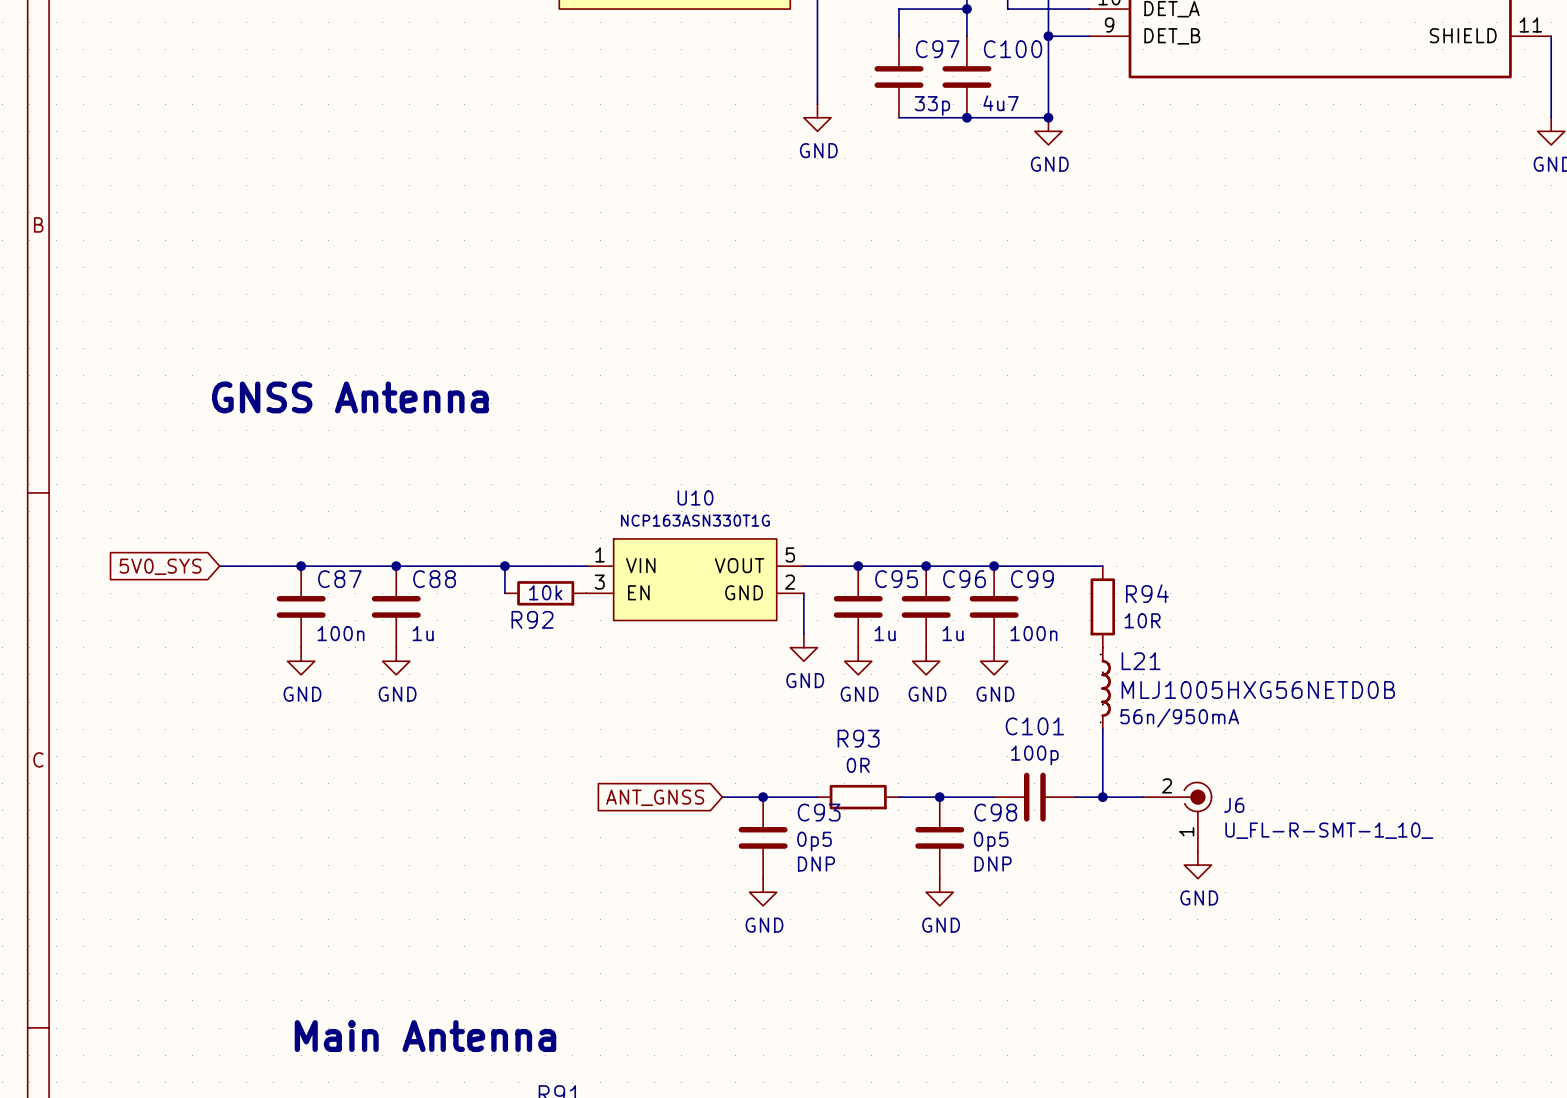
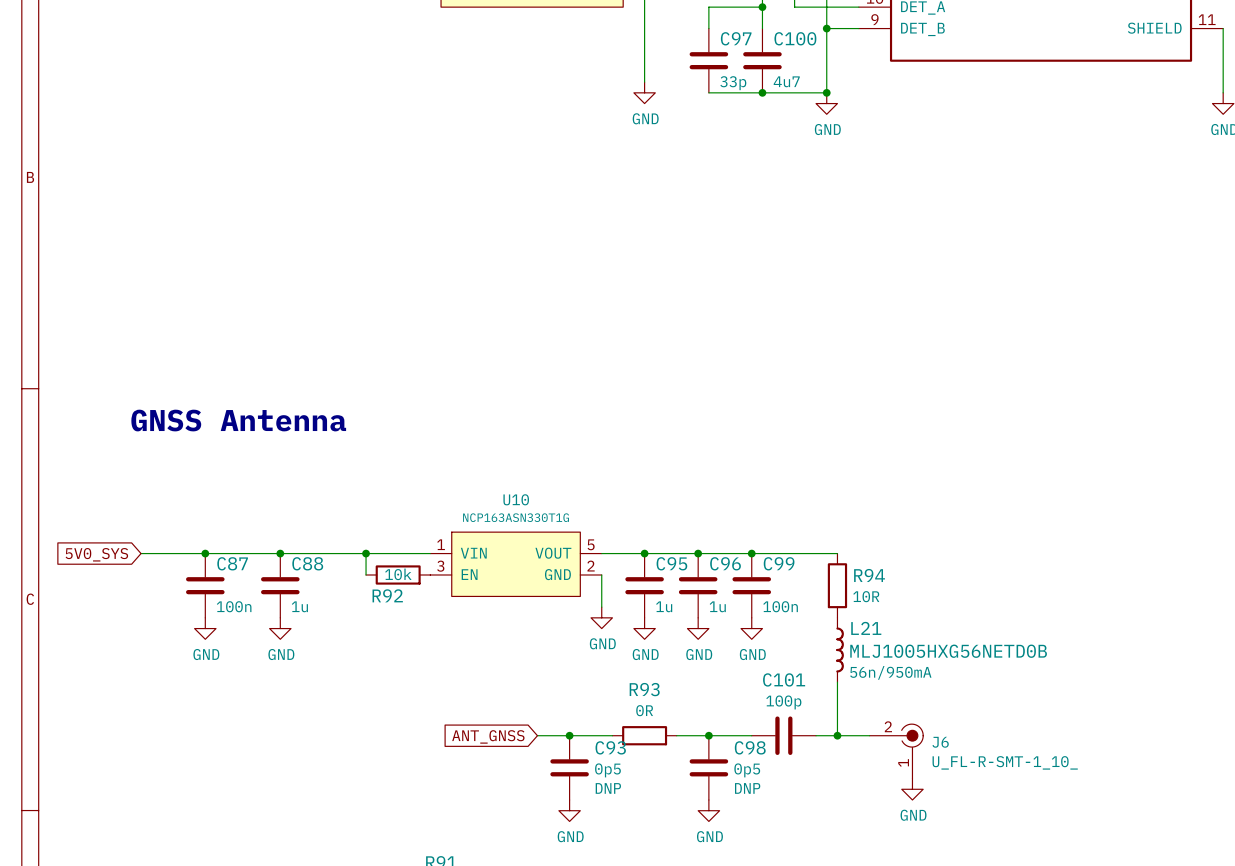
text position: GNSS Antenna (350, 397) -> GNSS Antenna (238, 420)
global label position: 5V0_SYS (160, 566) -> 5V0_SYS (96, 554)
wire: (219, 566) (586, 566) -> (141, 553) (430, 553)
junction: (301, 566) -> none
junction: (396, 566) -> none
wire: (504, 566) (504, 593) -> (366, 553) (366, 574)
junction: (504, 566) -> none
wire: (803, 566) (1102, 566) -> (601, 553) (837, 553)
junction: (858, 566) -> none
junction: (926, 566) -> none
junction: (994, 566) -> none
U10 position: (695, 579) -> (516, 564)
R92 position: (545, 593) -> (398, 574)
wire: (803, 593) (803, 634) -> (601, 574) (601, 607)
C87 position: (301, 606) -> (205, 585)
C88 position: (396, 606) -> (280, 585)
C95 position: (858, 606) -> (644, 585)
C96 position: (926, 606) -> (698, 585)
C99 position: (994, 606) -> (751, 585)
R94 position: (1102, 606) -> (837, 585)
power symbol: GND (803, 647) -> none
power symbol: GND (301, 661) -> none
power symbol: GND (396, 661) -> none
power symbol: GND (858, 661) -> none
power symbol: GND (926, 661) -> none
power symbol: GND (994, 661) -> none
L21 position: (1105, 688) -> (839, 649)
junction: none -> (205, 553)
junction: none -> (280, 553)
junction: none -> (366, 553)
junction: none -> (644, 553)
junction: none -> (698, 553)
junction: none -> (751, 553)
wire: (1102, 729) (1102, 797) -> (837, 682) (837, 735)
power symbol: none -> GND (601, 617)
power symbol: none -> GND (205, 628)
power symbol: none -> GND (280, 628)
global label position: ANT_GNSS (655, 797) -> ANT_GNSS (488, 736)
wire: (722, 797) (817, 797) -> (537, 735) (612, 735)
junction: (763, 797) -> none
power symbol: none -> GND (644, 628)
R93 position: (858, 797) -> (644, 735)
power symbol: none -> GND (698, 628)
wire: (898, 797) (994, 797) -> (676, 735) (751, 735)
junction: (939, 797) -> none
power symbol: none -> GND (751, 628)
C101 position: (1034, 797) -> (783, 735)
wire: (1075, 797) (1143, 797) -> (816, 735) (869, 735)
junction: (1102, 797) -> none
J6 position: (1177, 816) -> (896, 751)
C93 position: (763, 837) -> (569, 767)
C98 position: (939, 837) -> (708, 767)
power symbol: GND (1197, 865) -> none
power symbol: GND (763, 892) -> none
power symbol: GND (939, 892) -> none
junction: none -> (569, 735)
junction: none -> (708, 735)
junction: none -> (837, 735)
power symbol: none -> GND (912, 789)
power symbol: none -> GND (569, 810)
power symbol: none -> GND (708, 810)
text: Main Antenna (425, 1036) -> none

